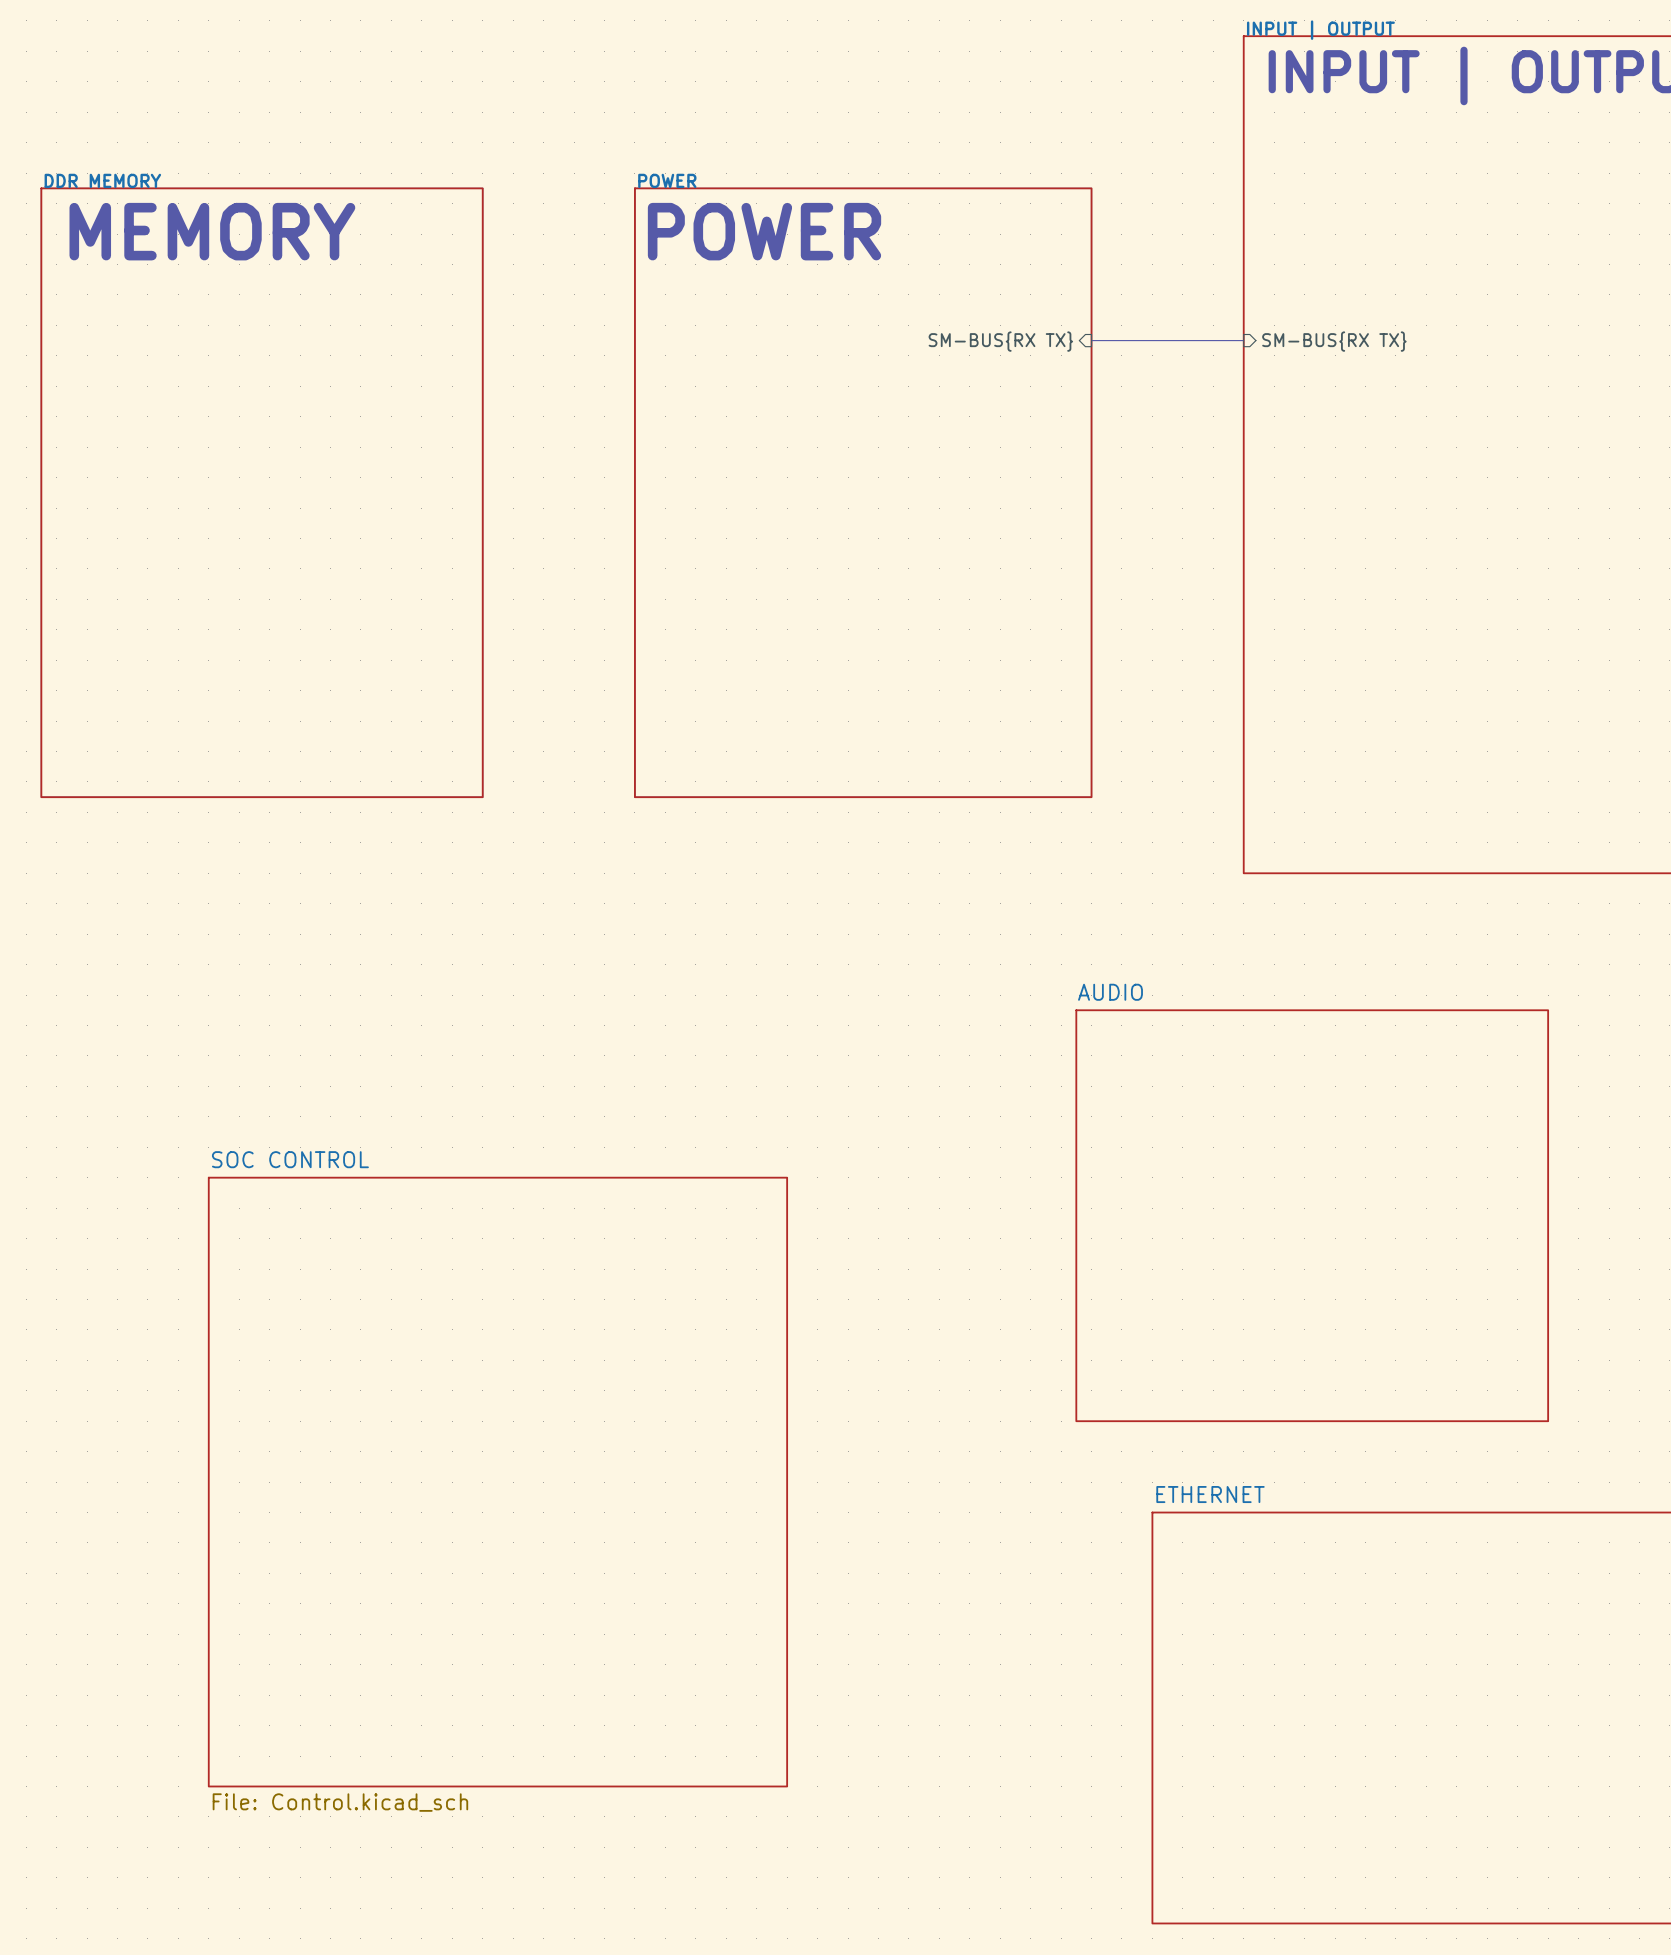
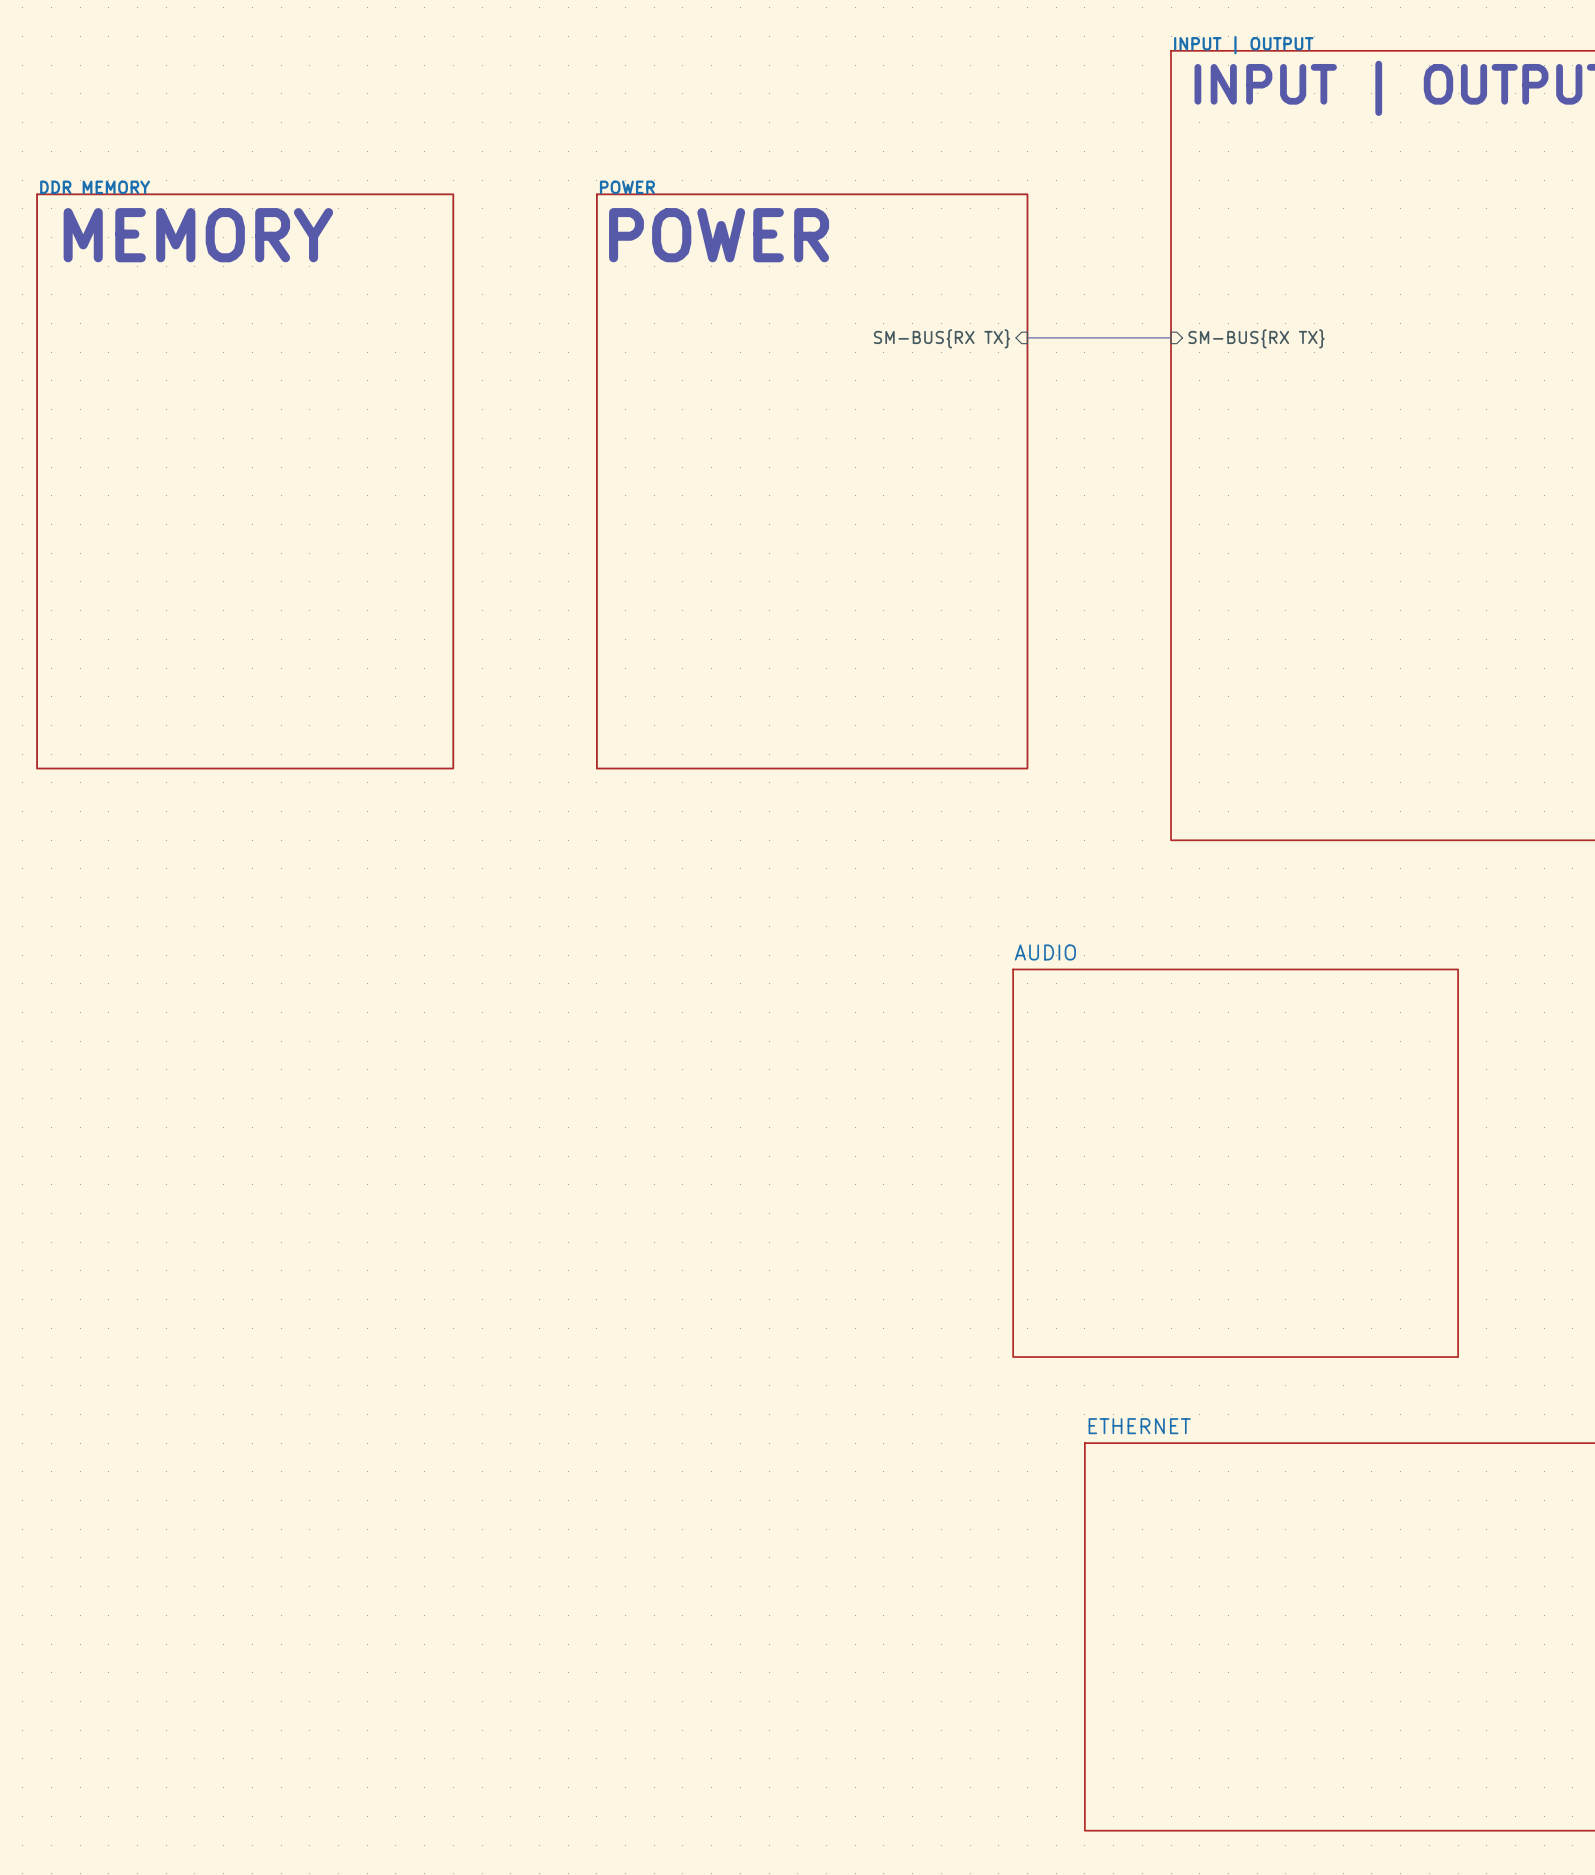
sheet SOC CONTROL: File: Control.kicad_sch (497, 1482) -> none

